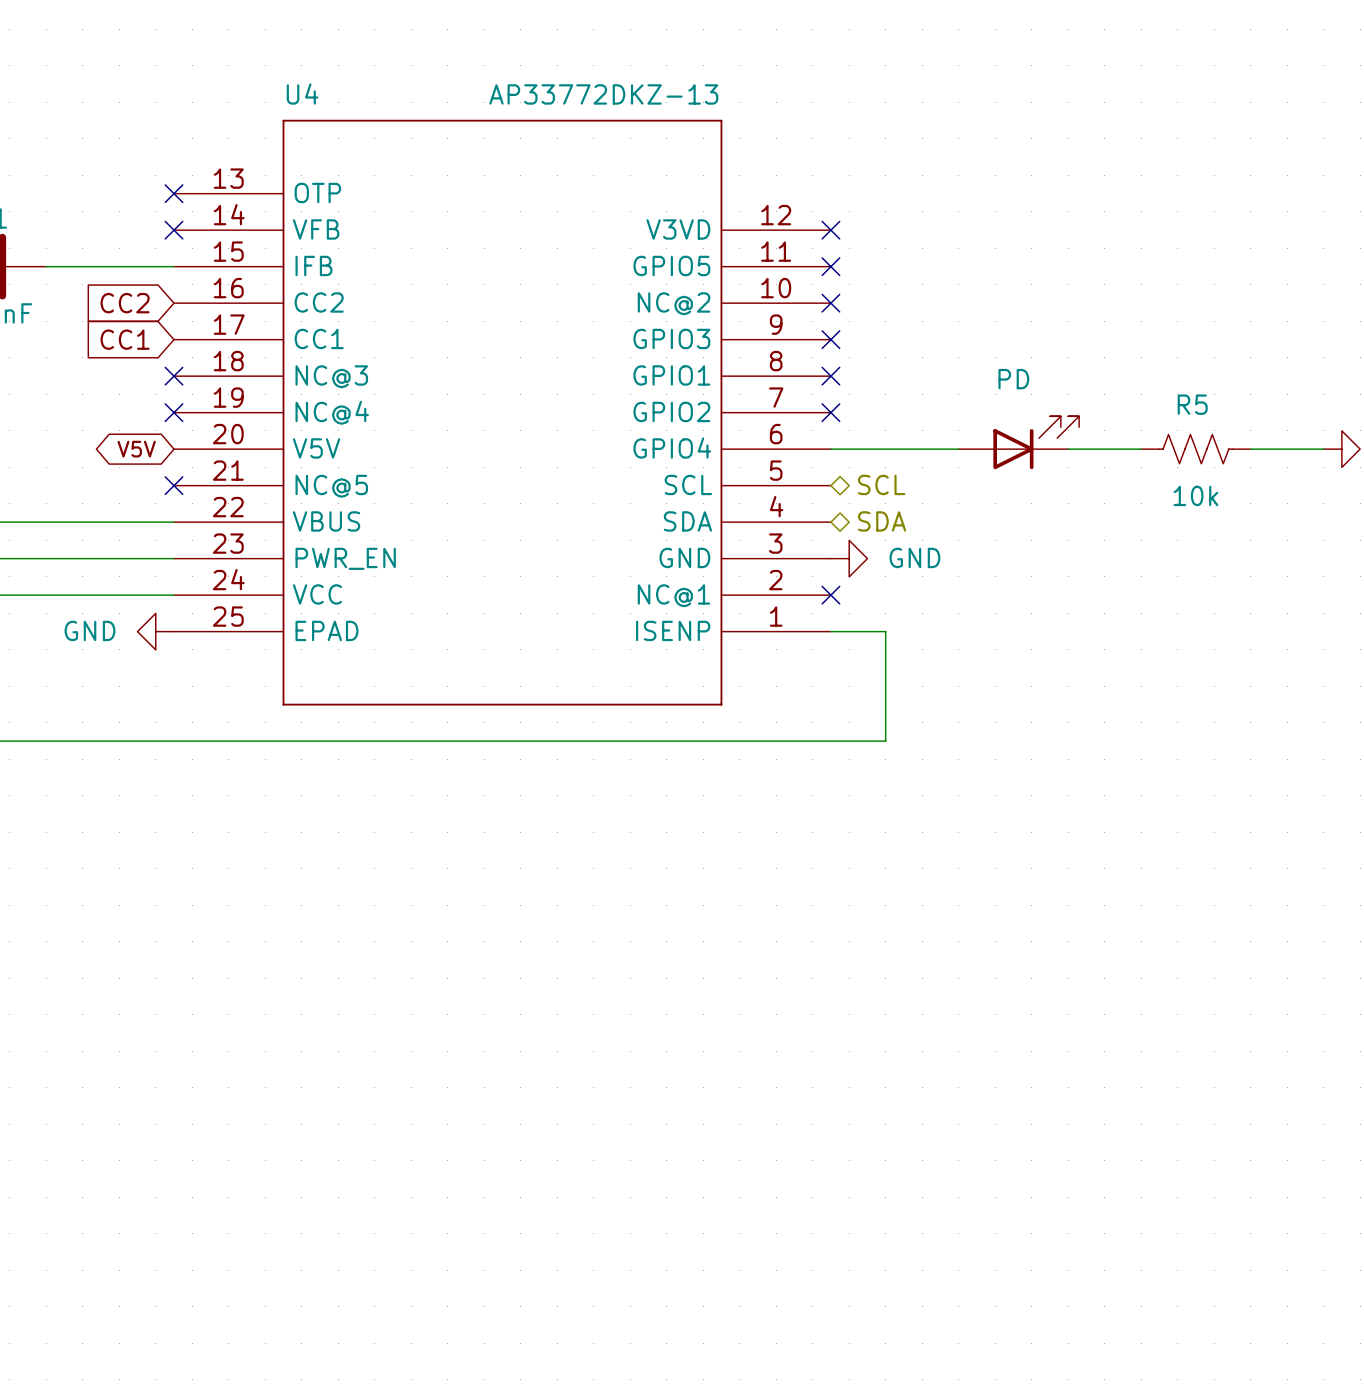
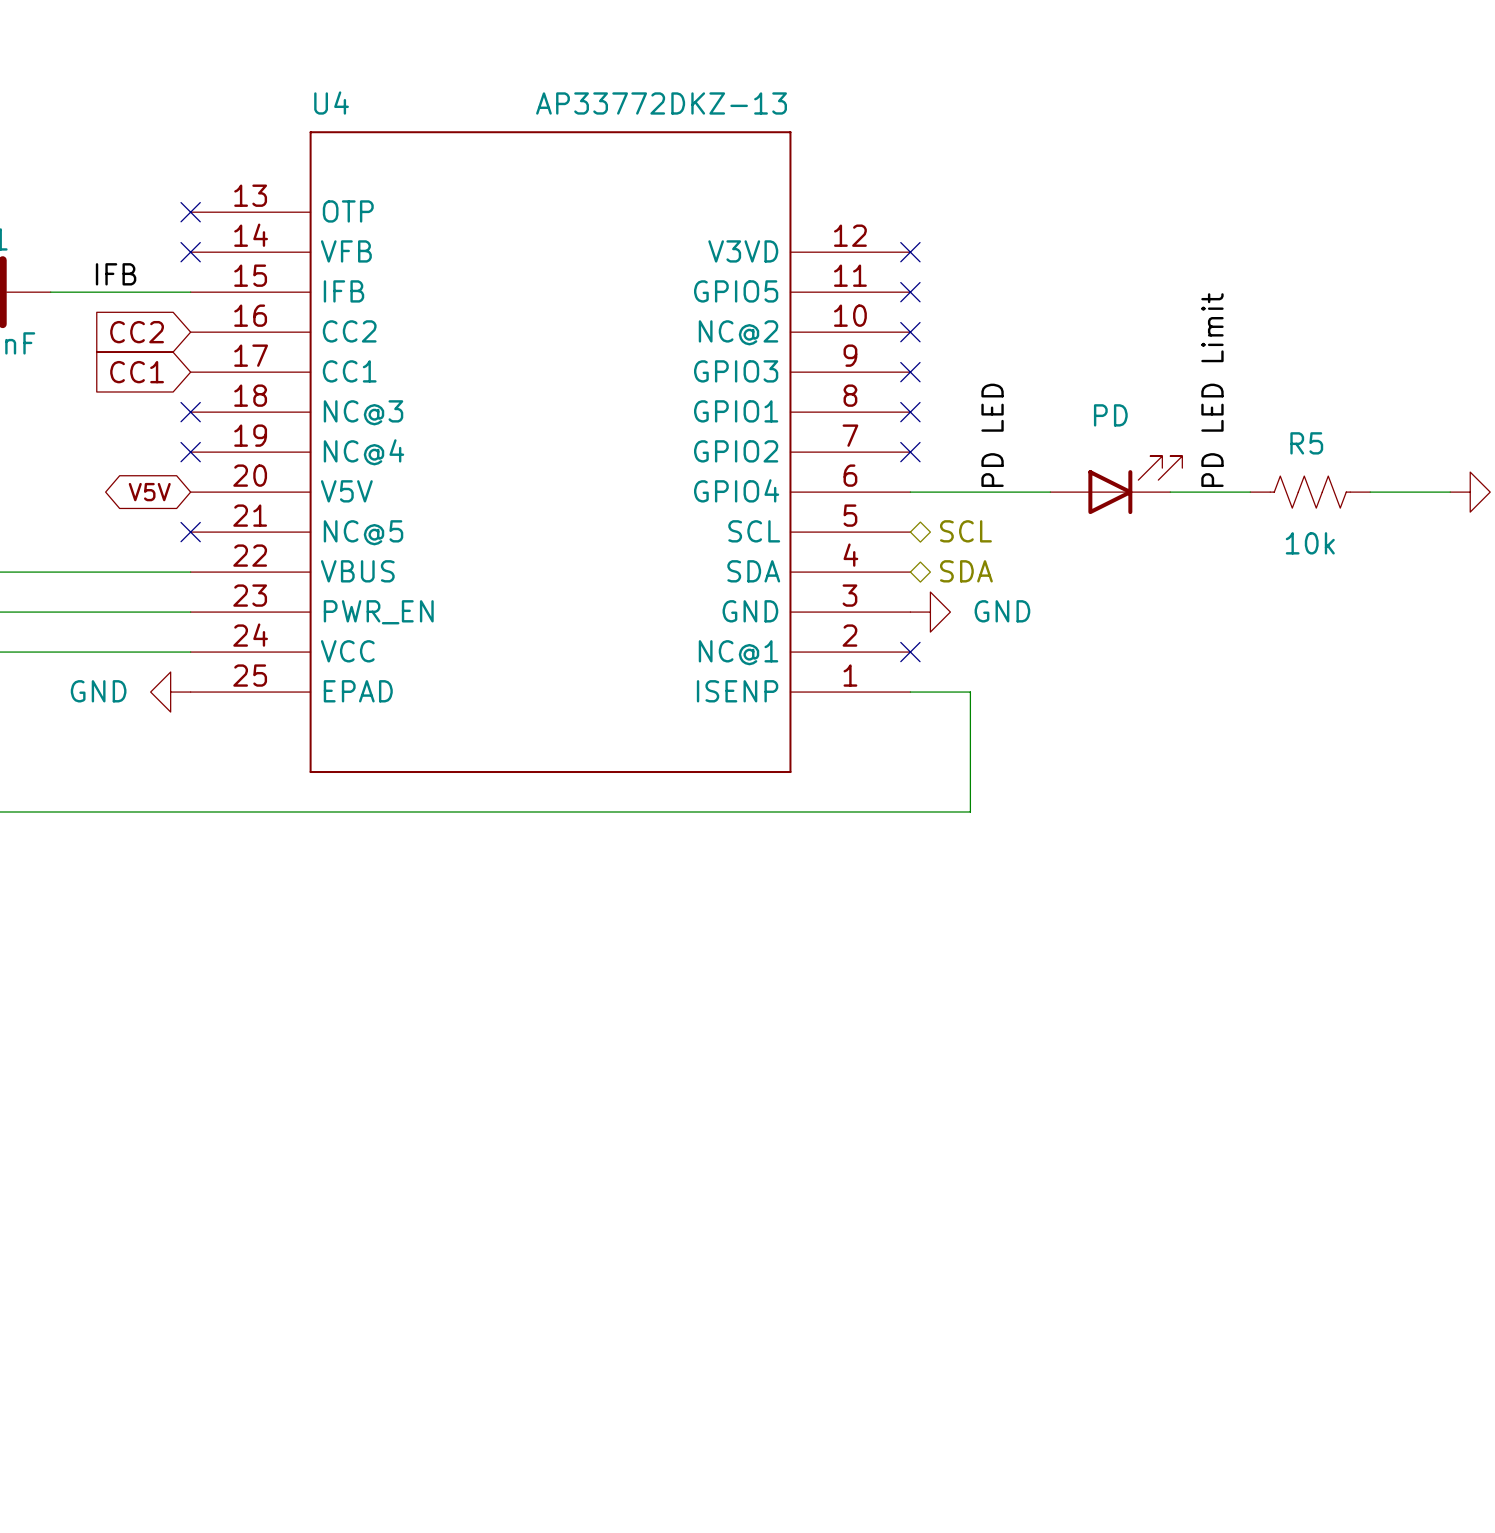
label: none -> IFB (116, 274)
label: none -> PD LED Limit (1212, 390)
label: none -> PD LED (992, 435)

